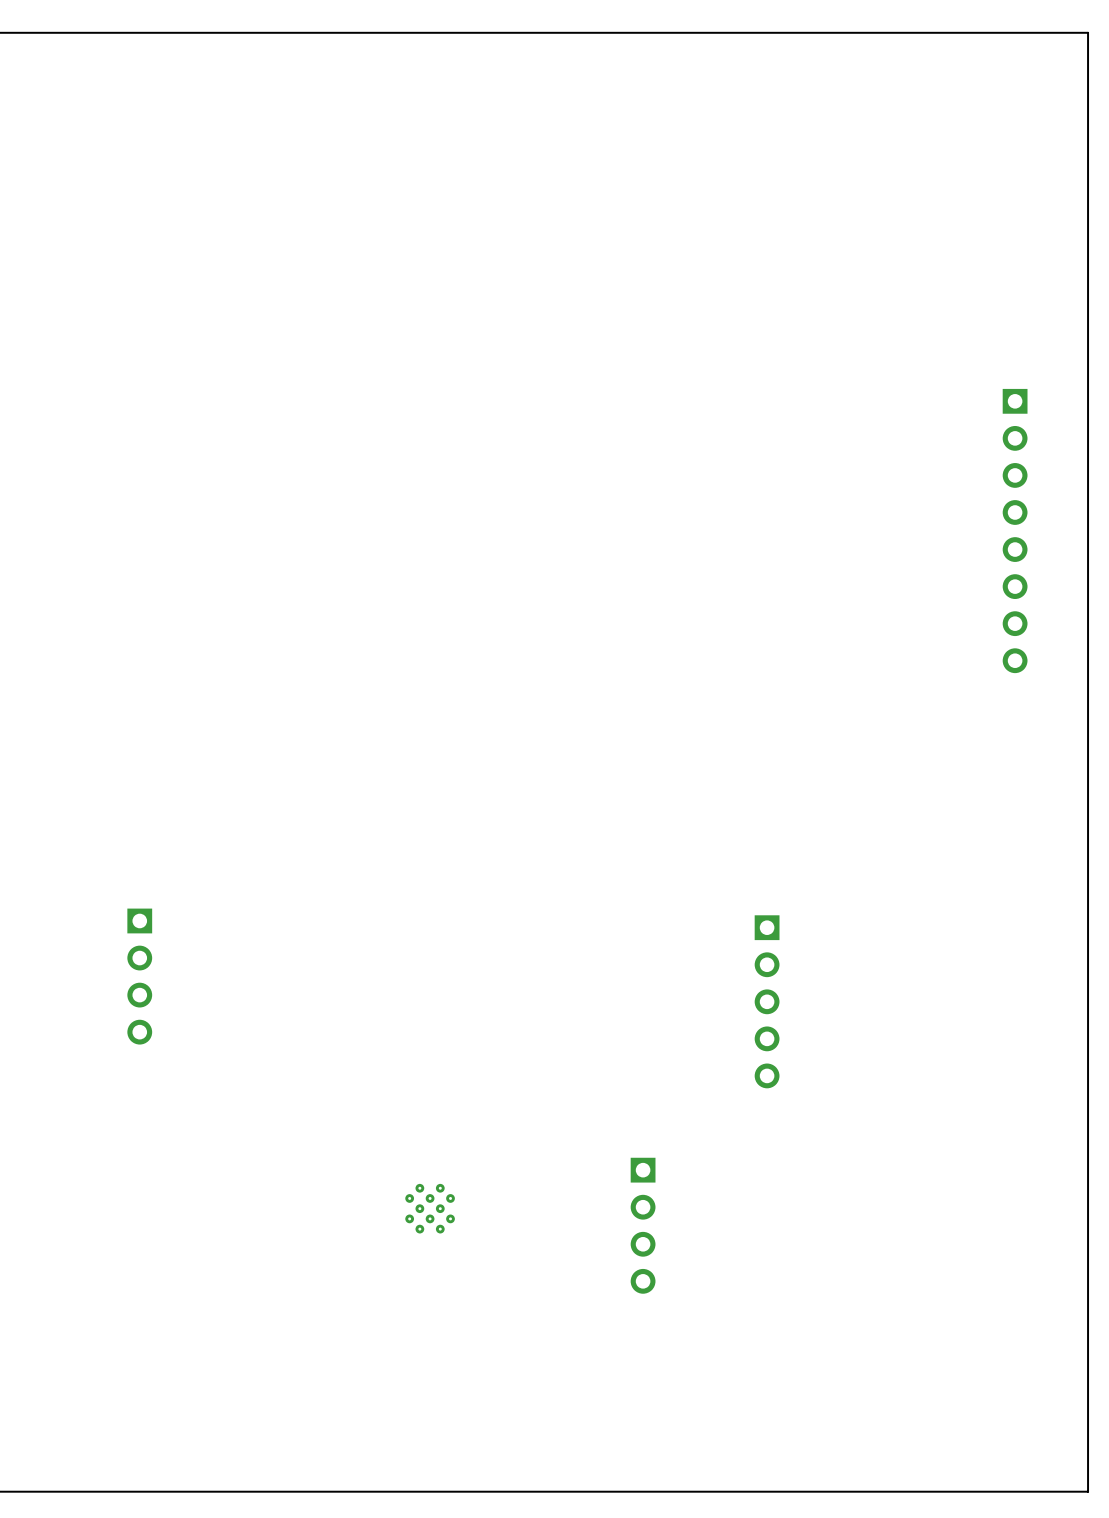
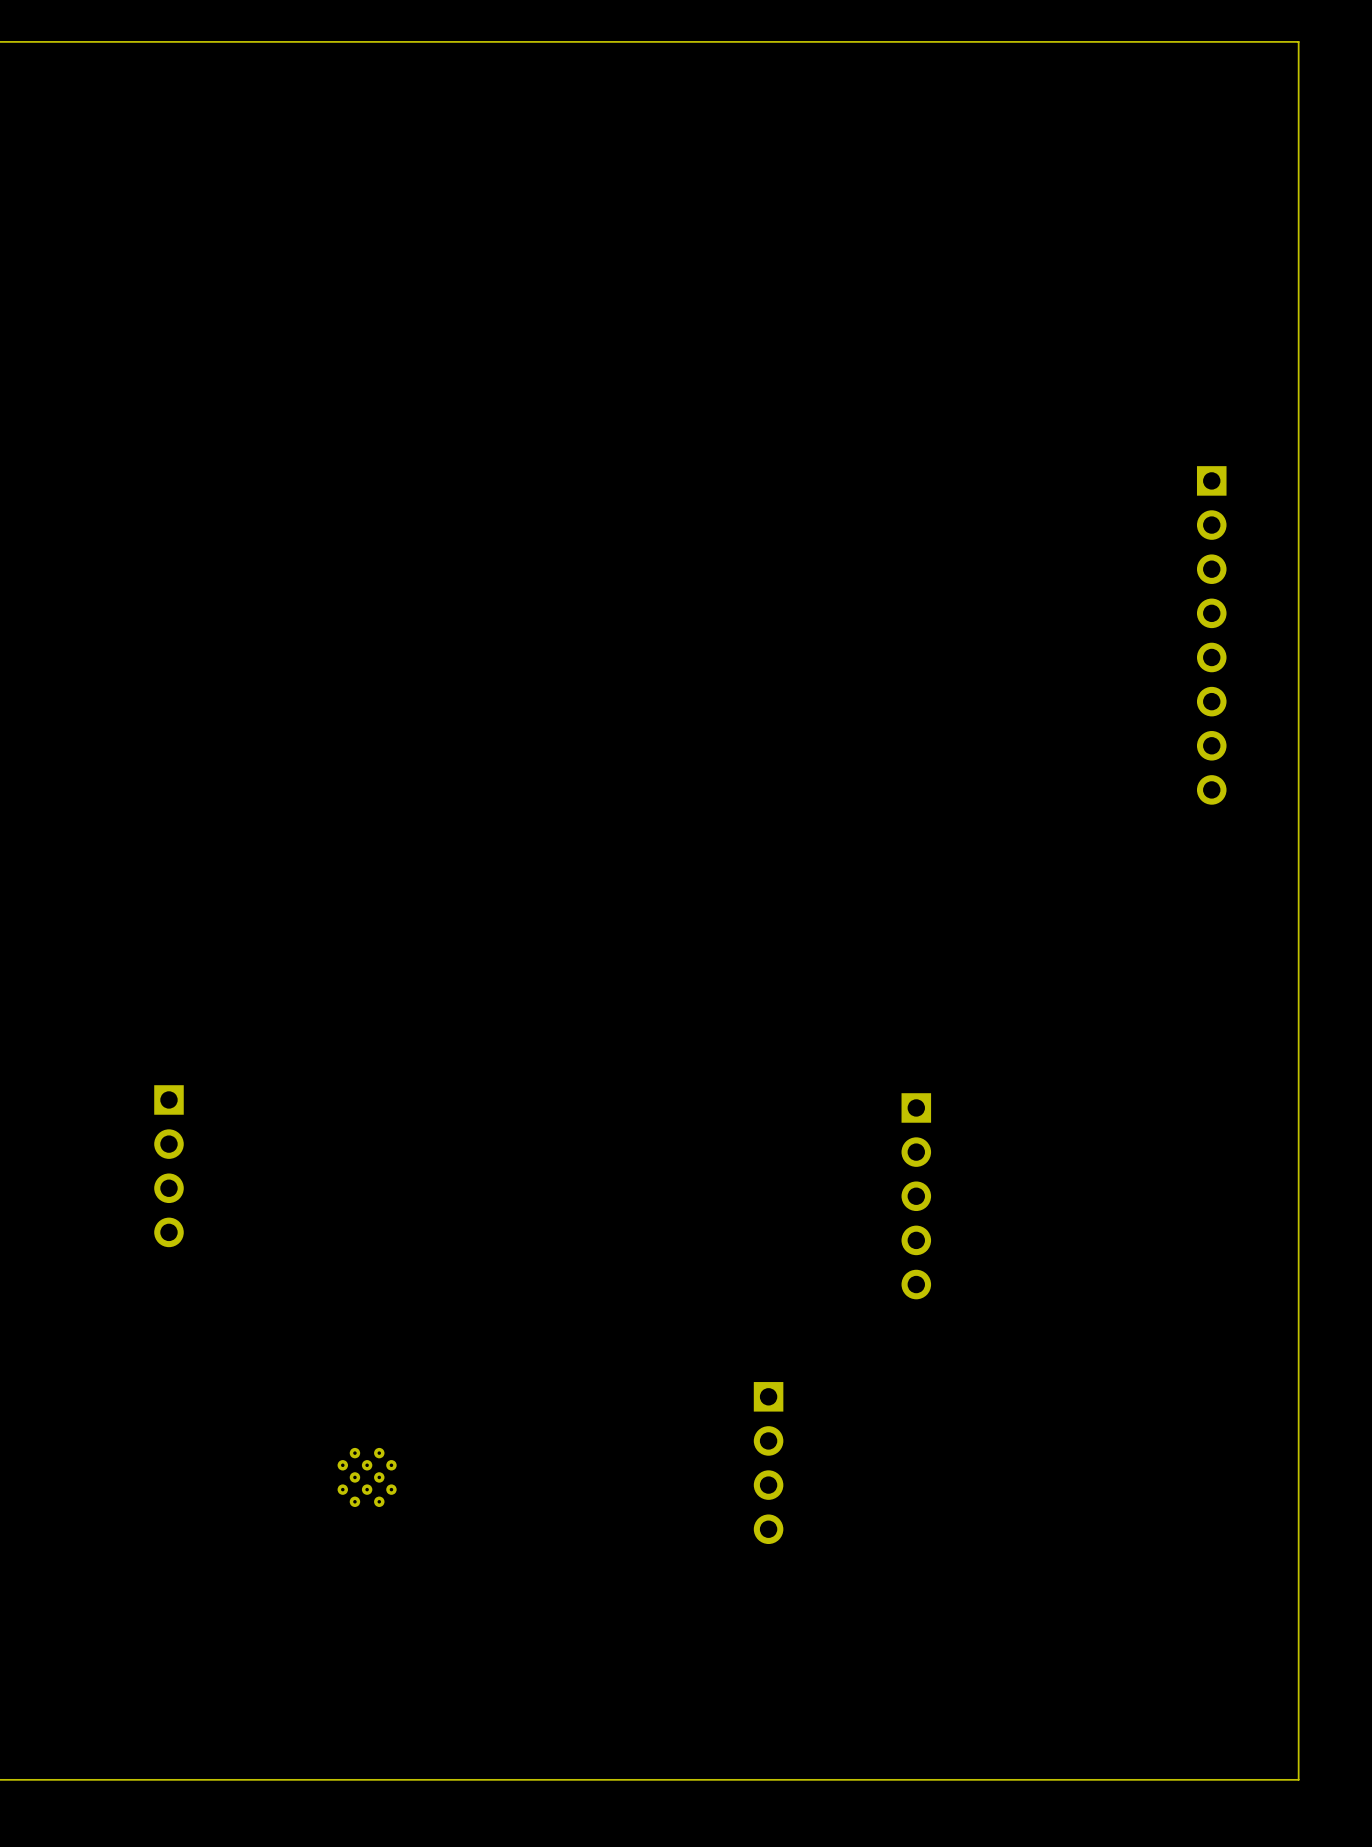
part position: (430, 1208) -> (367, 1477)

